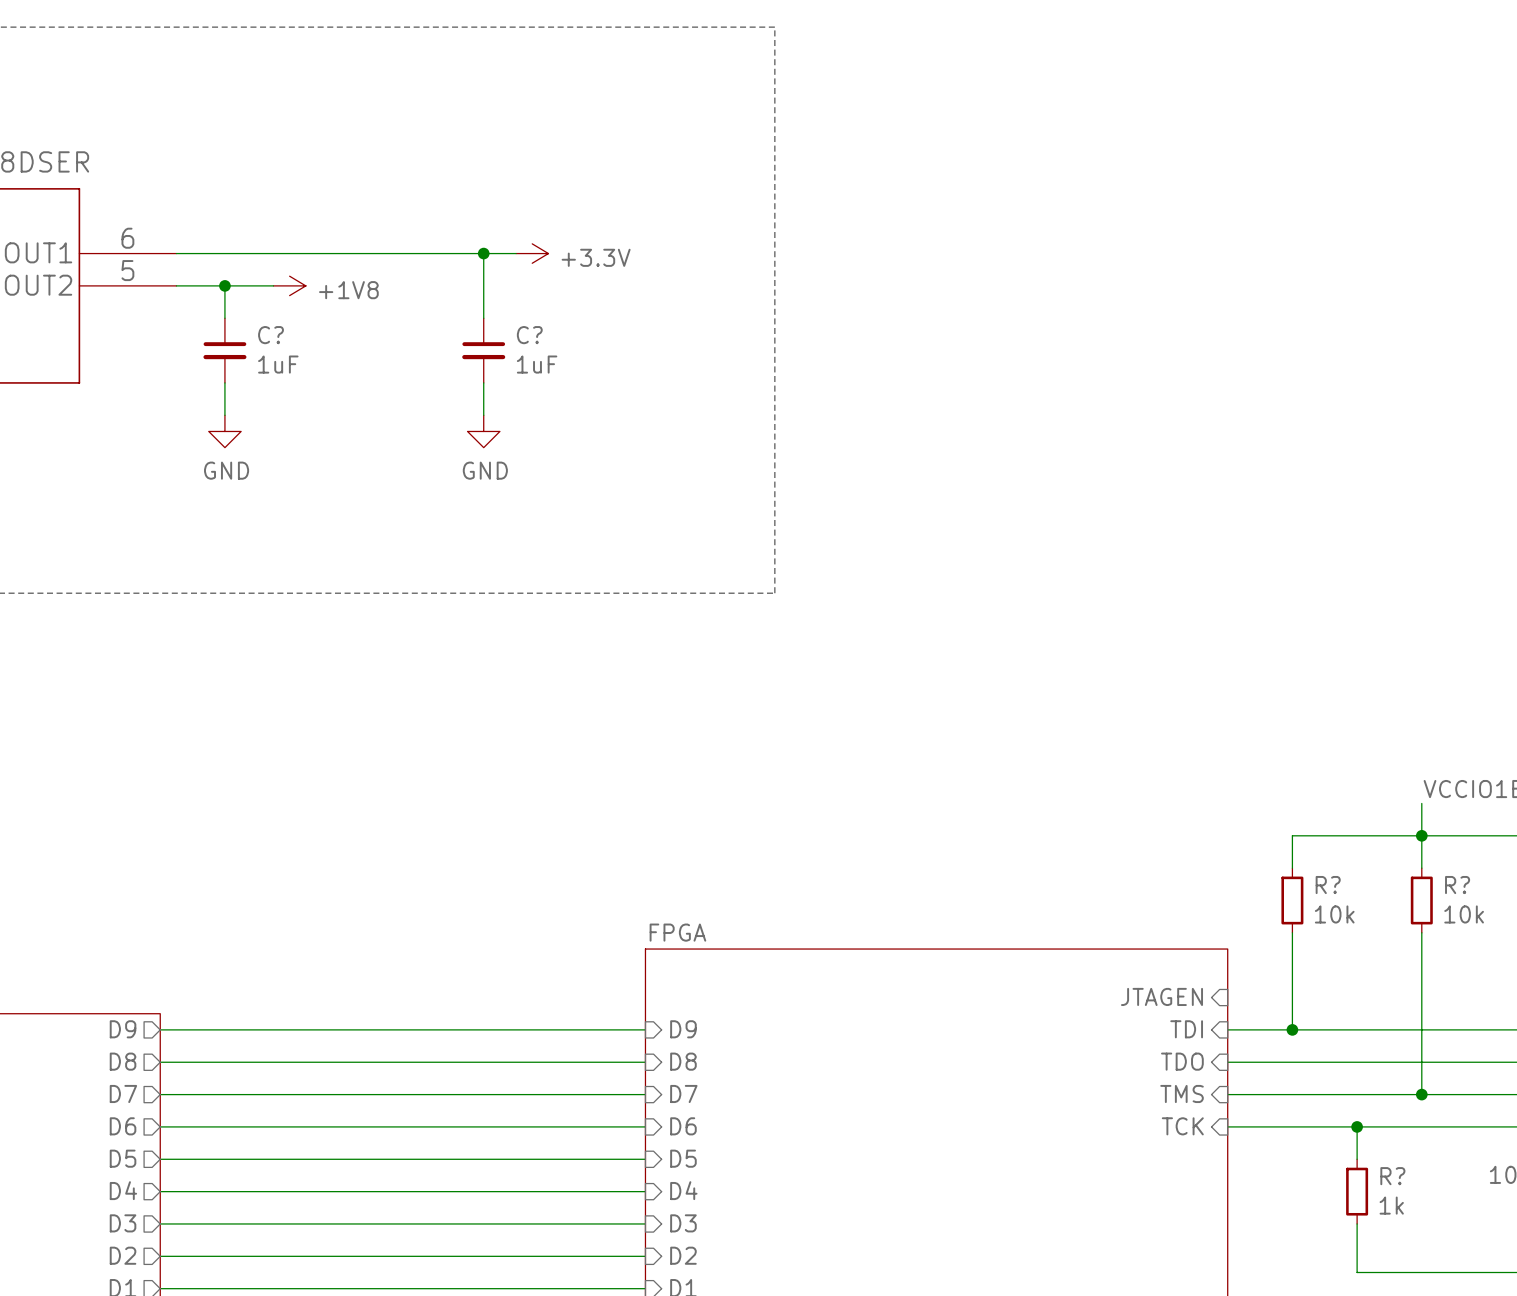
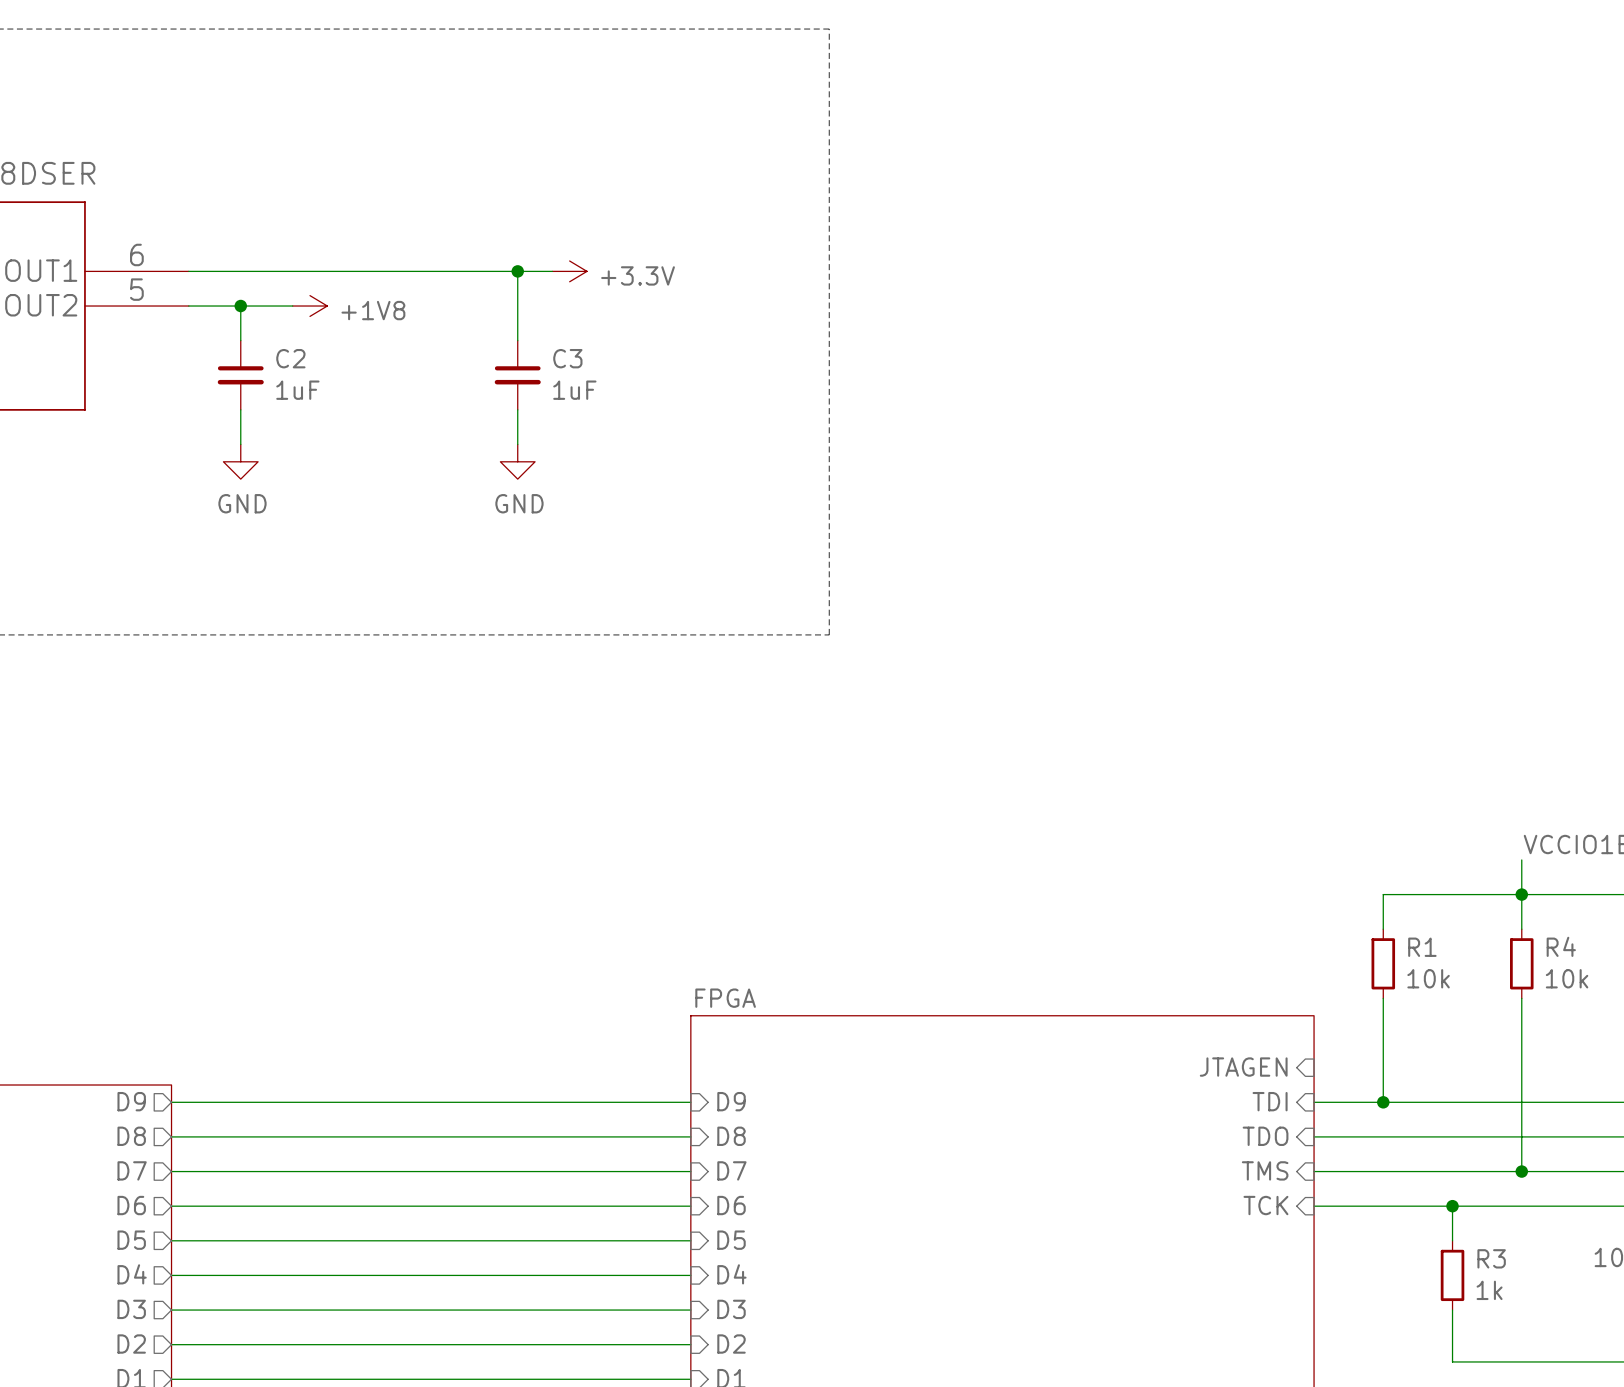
C? name: C? (271, 335) -> C2 (290, 358)
C? name: C? (529, 335) -> C3 (567, 358)
R? name: R? (1328, 885) -> R1 (1422, 947)
R? name: R? (1457, 885) -> R4 (1561, 946)
R? name: R? (1392, 1176) -> R3 (1491, 1258)

